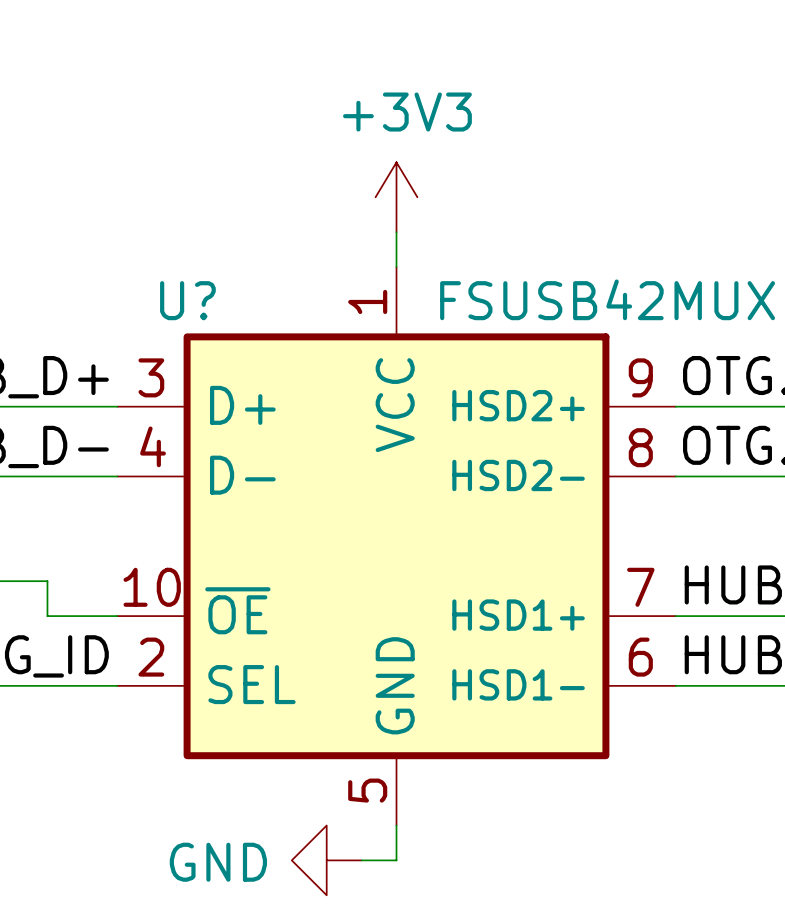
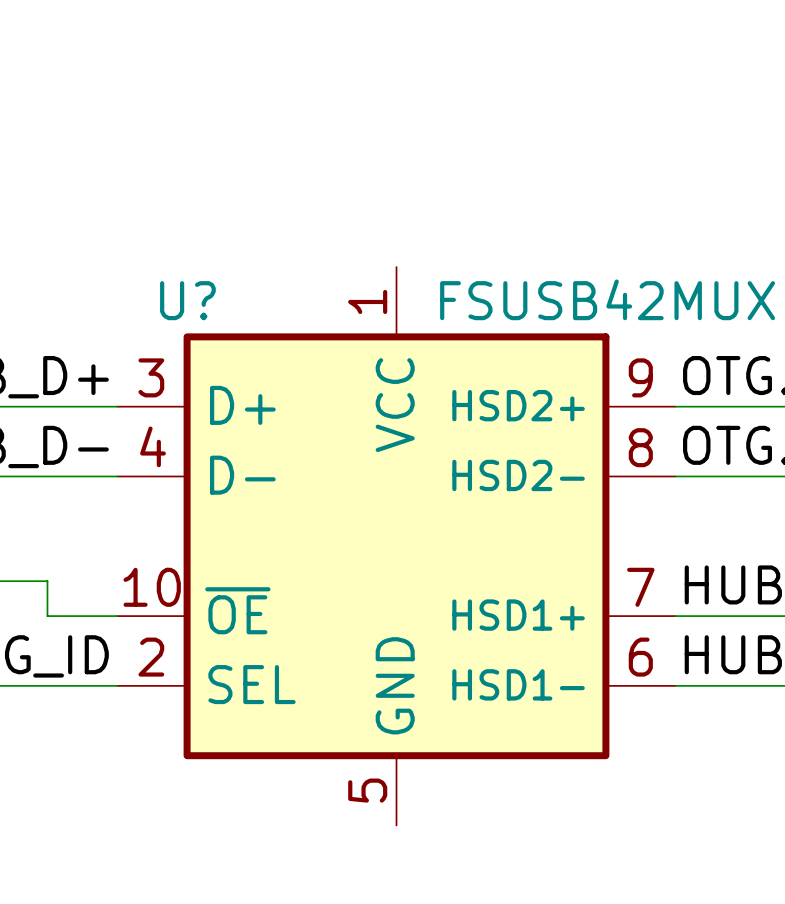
power symbol: +3V3 (396, 197) -> none
wire: (396, 232) (396, 267) -> none
wire: (396, 825) (396, 860) (361, 860) -> none
power symbol: GND (326, 860) -> none

